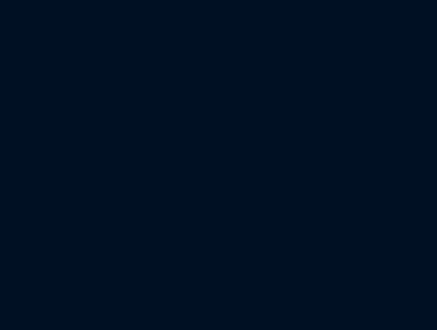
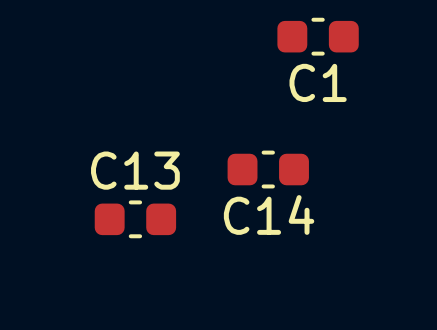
C1: none -> (318, 36)
C14: none -> (268, 169)
C13: none -> (135, 219)

